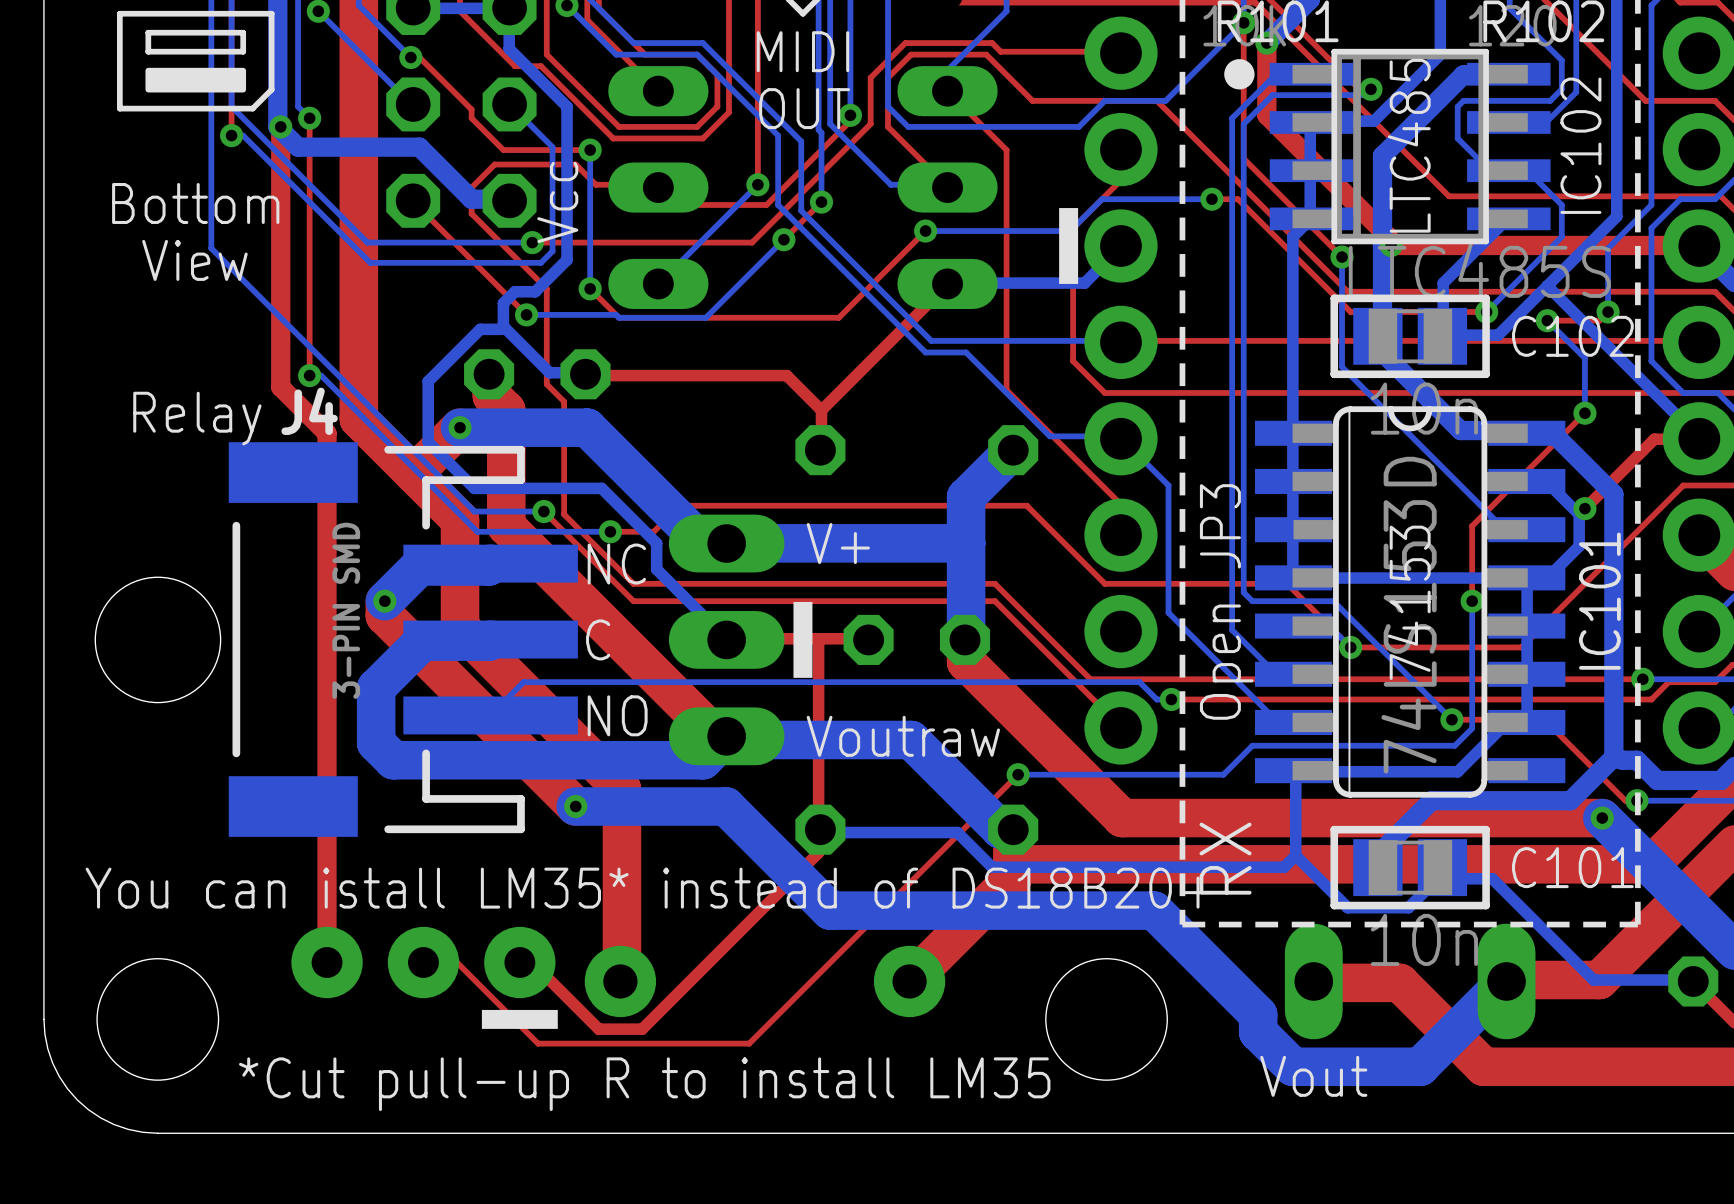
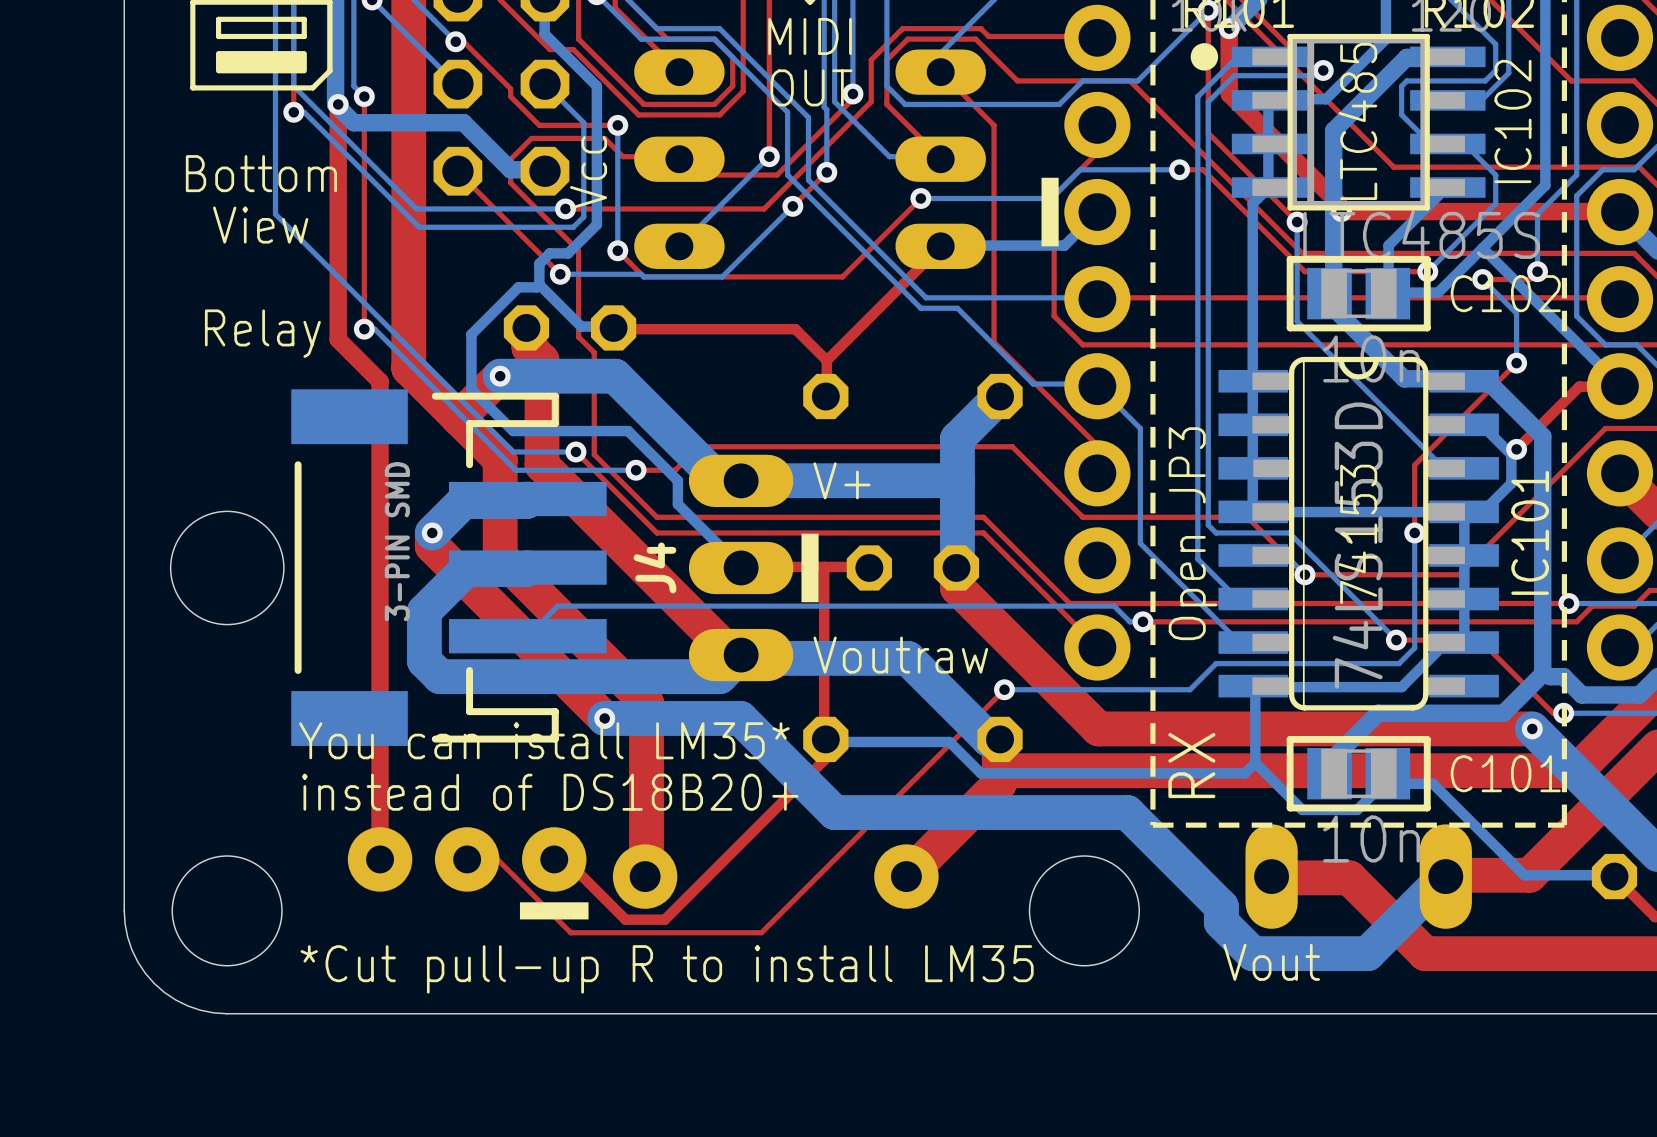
J4 name rotation: 0° (309, 411) -> 90° counterclockwise (654, 567)
J4 name position: J4 (309, 411) -> J4 (654, 567)
text position: Relay (197, 418) -> Relay (262, 333)
text: NC (616, 564) -> none
text: C (598, 639) -> none
text: NO (617, 715) -> none
text: none -> You can istall LM35* (544, 740)
text: none -> instead of DS18B20+ (550, 792)
text: You can istall LM35* instead of DS18B20+ (649, 888) -> none

